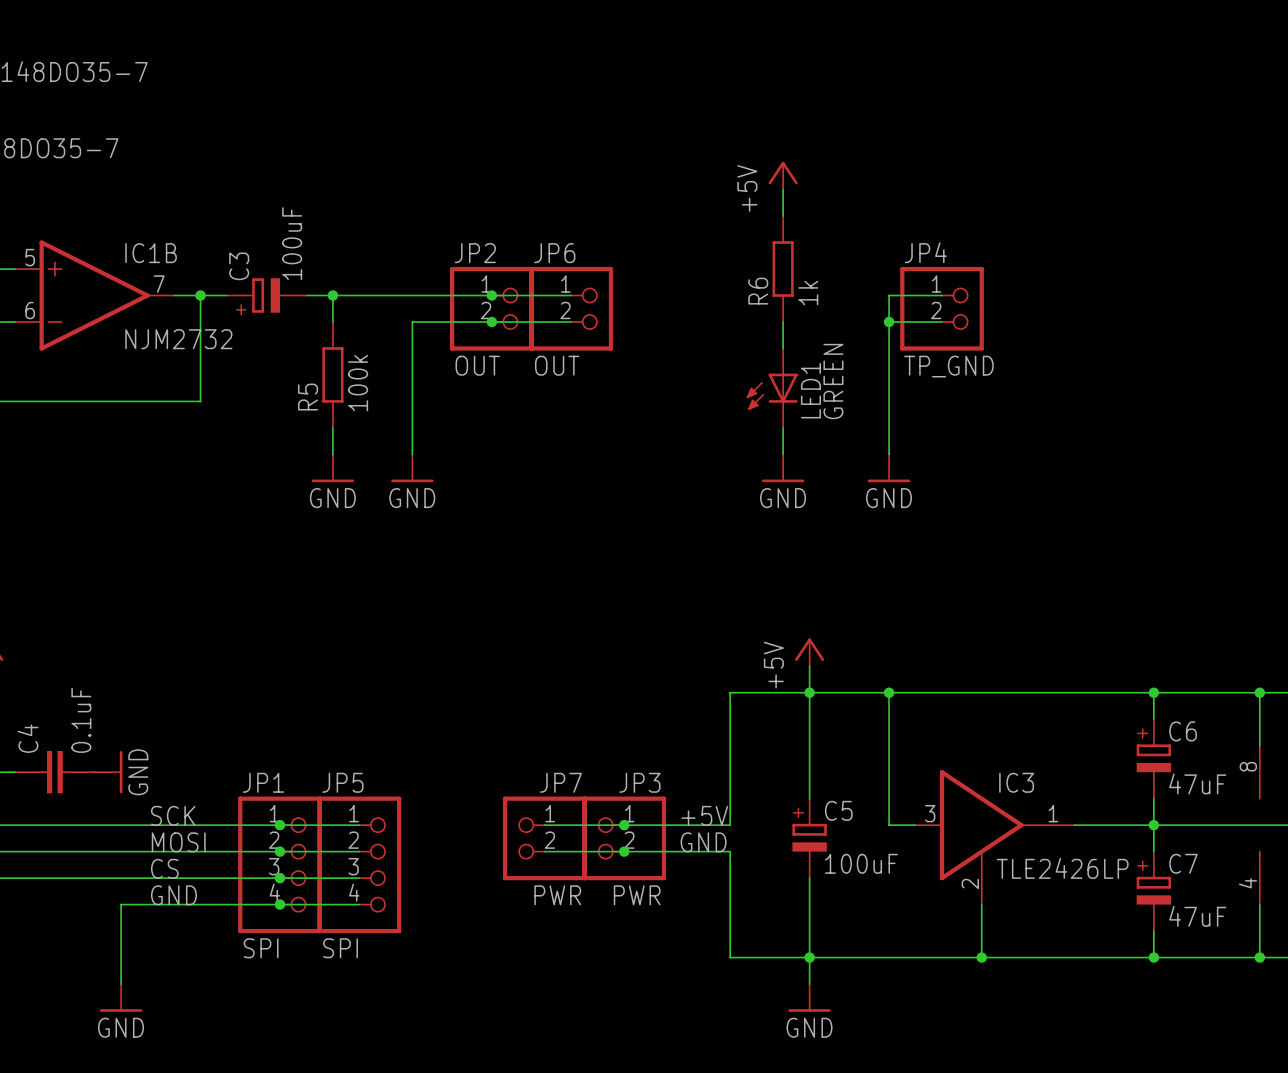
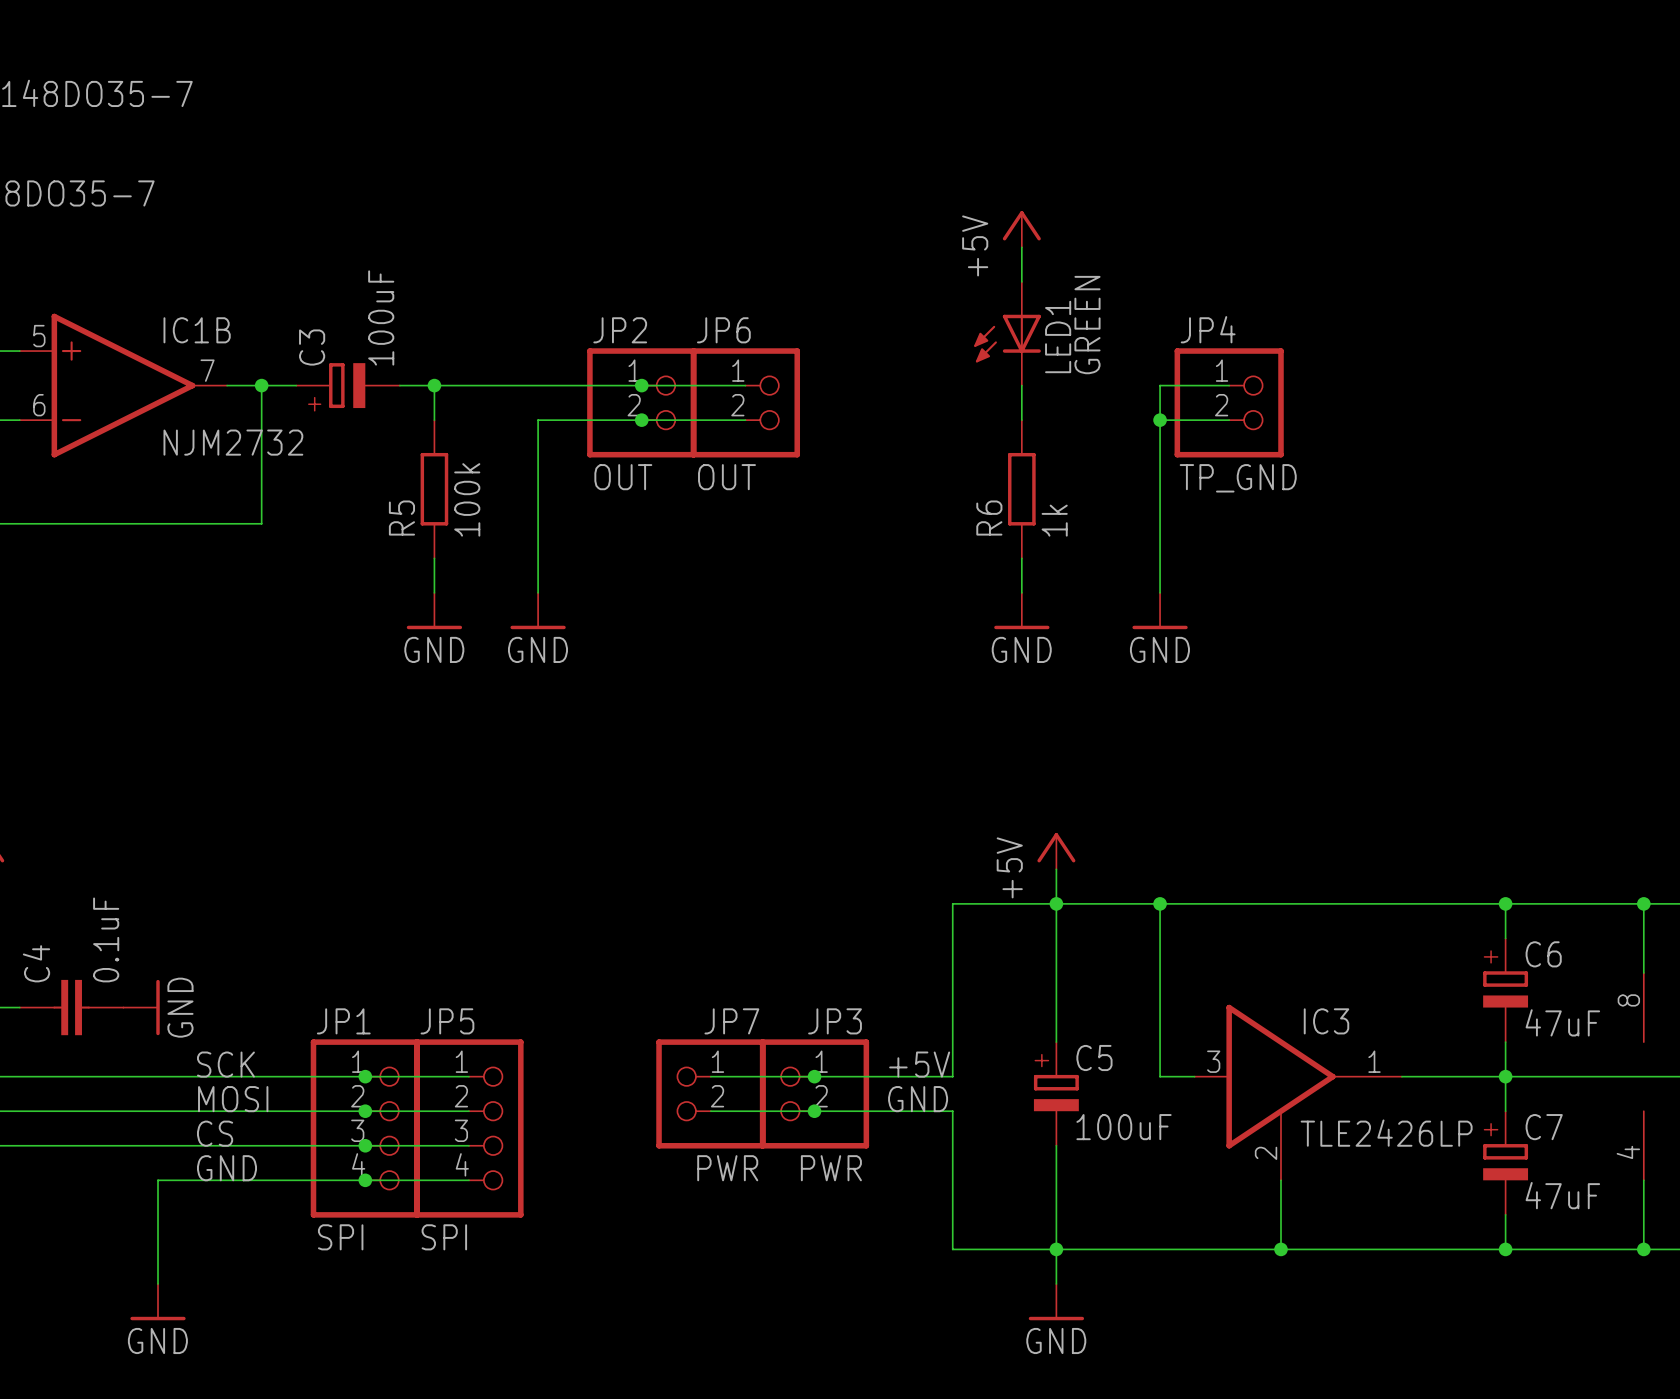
R6 position: (783, 269) -> (1021, 489)
LED1 position: (772, 388) -> (1007, 333)

